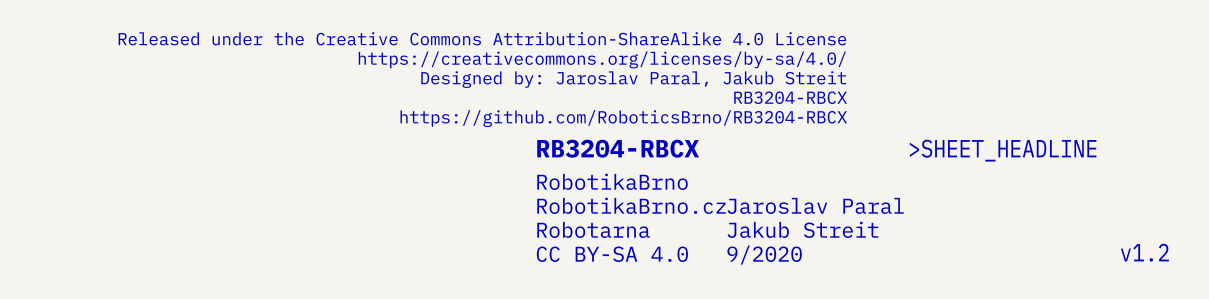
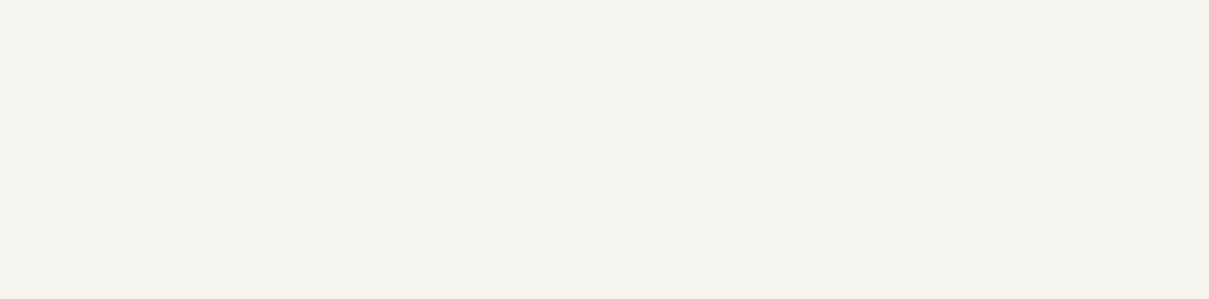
text: Released under the Creative Commons Attribution-ShareAlike 4.0 License (482, 38) -> none
text: https://creativecommons.org/licenses/by-sa/4.0/ (602, 59) -> none
text: Designed by: Jaroslav Paral, Jakub Streit (633, 79) -> none
text: RB3204-RBCX (790, 97) -> none
text: https://github.com/RoboticsBrno/RB3204-RBCX (623, 118) -> none
text: RB3204-RBCX (618, 148) -> none
text: >SHEET_HEADLINE (1003, 150) -> none
text: RobotikaBrno (612, 181) -> none
text: RobotikaBrno.cz (631, 205) -> none
text: Jaroslav Paral (815, 205) -> none
text: Robotarna (593, 229) -> none
text: Jakub Streit (802, 229) -> none
text: v1.2 (1144, 252) -> none
text: CC BY-SA 4.0 (612, 254) -> none
text: 9/2020 (764, 255) -> none

